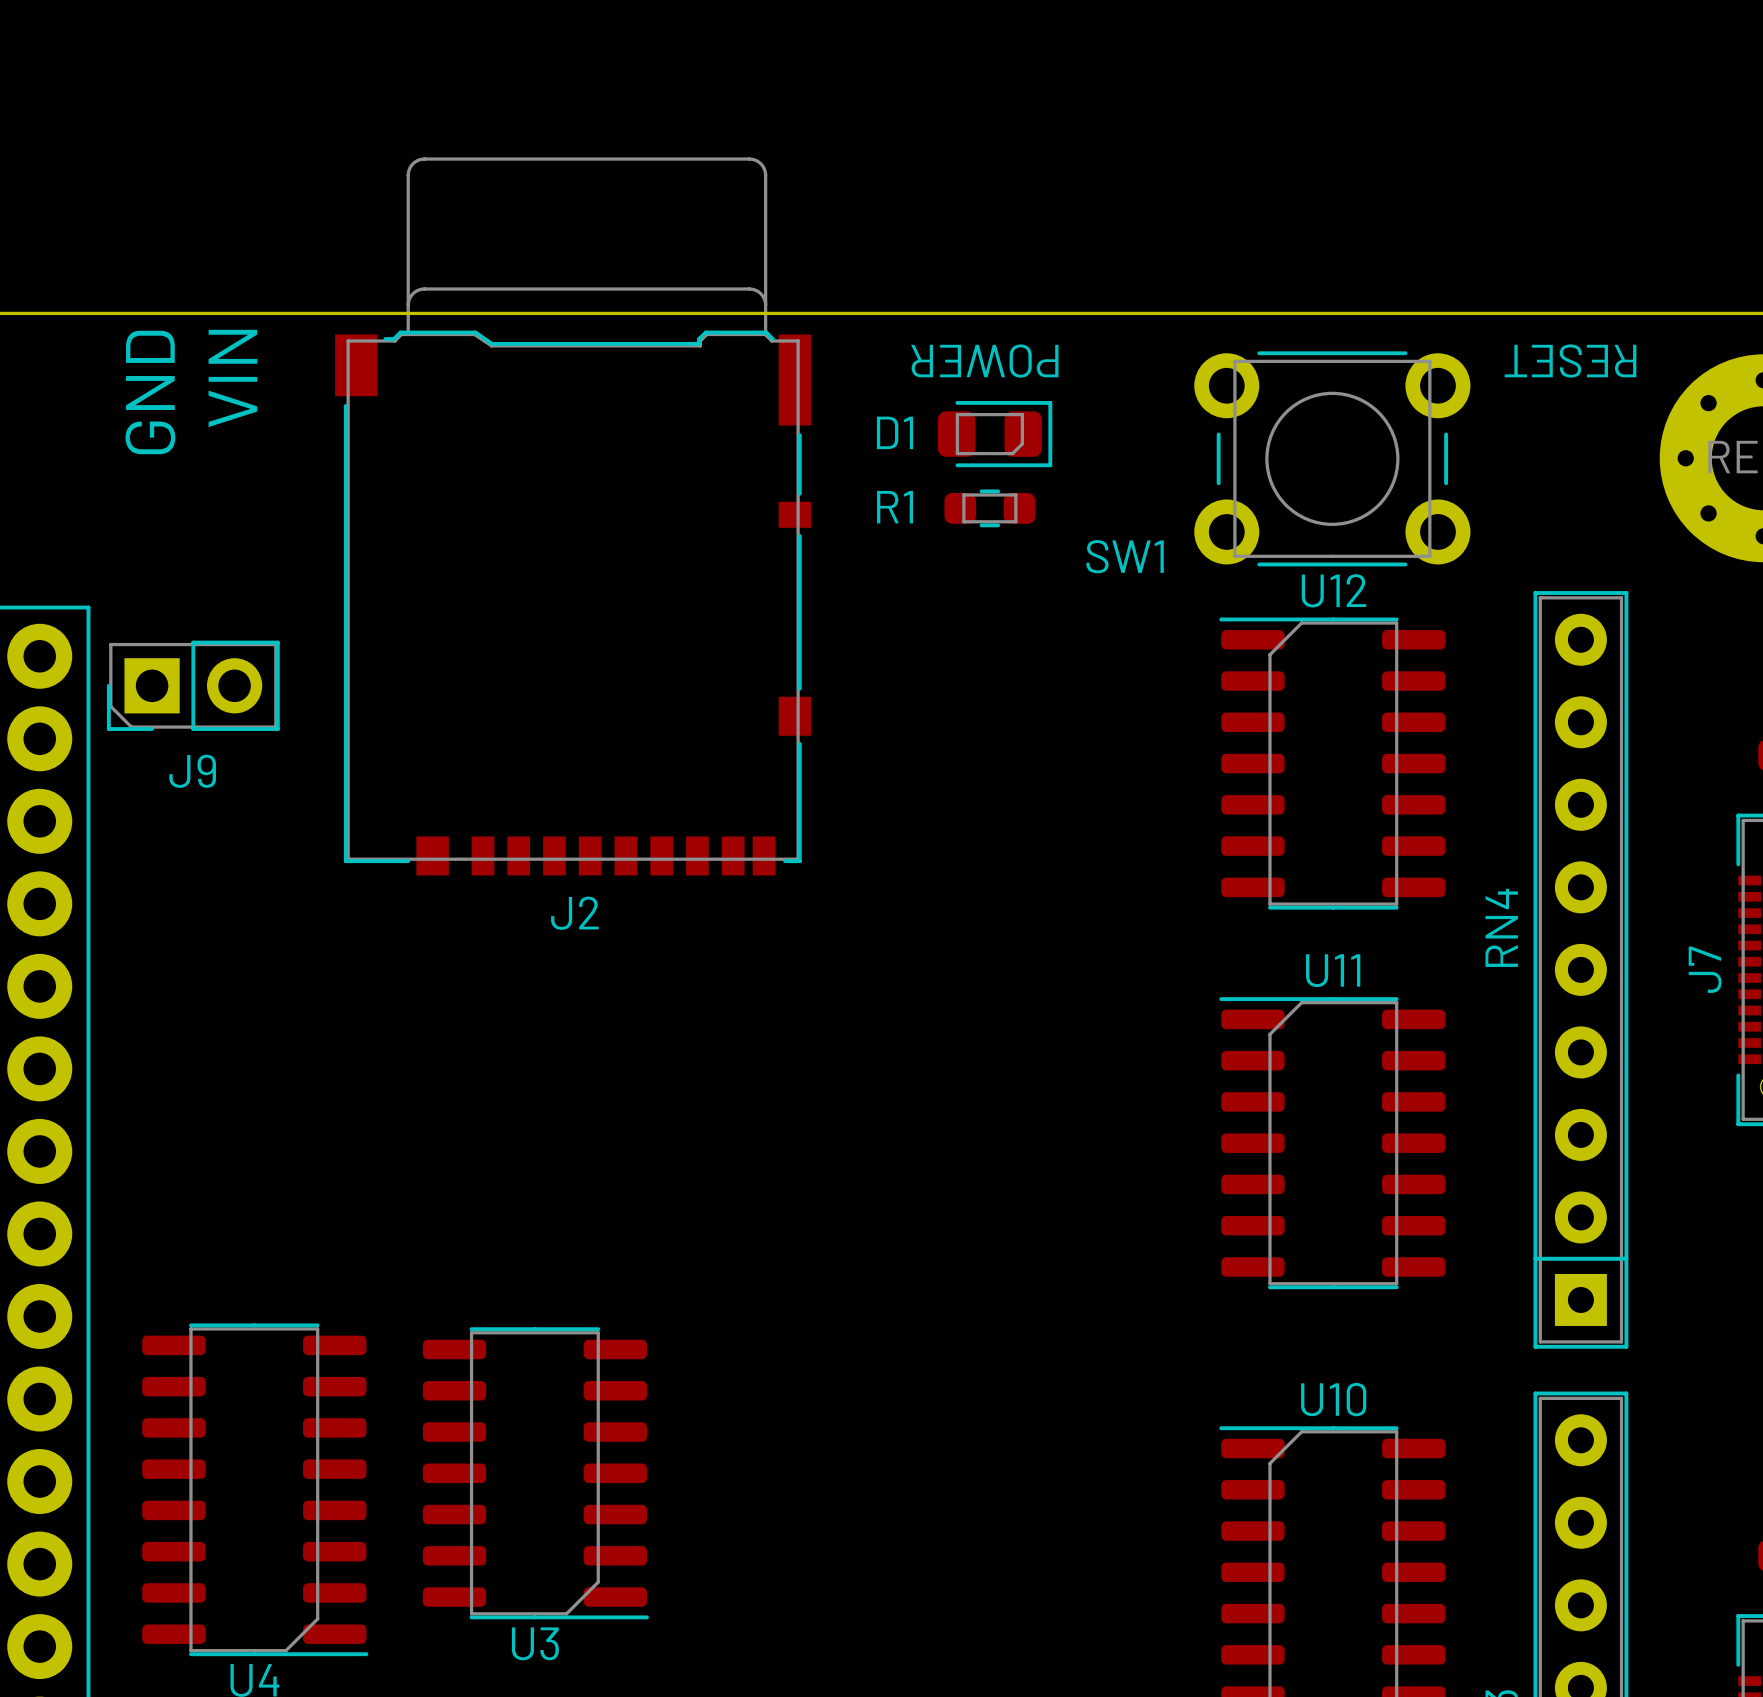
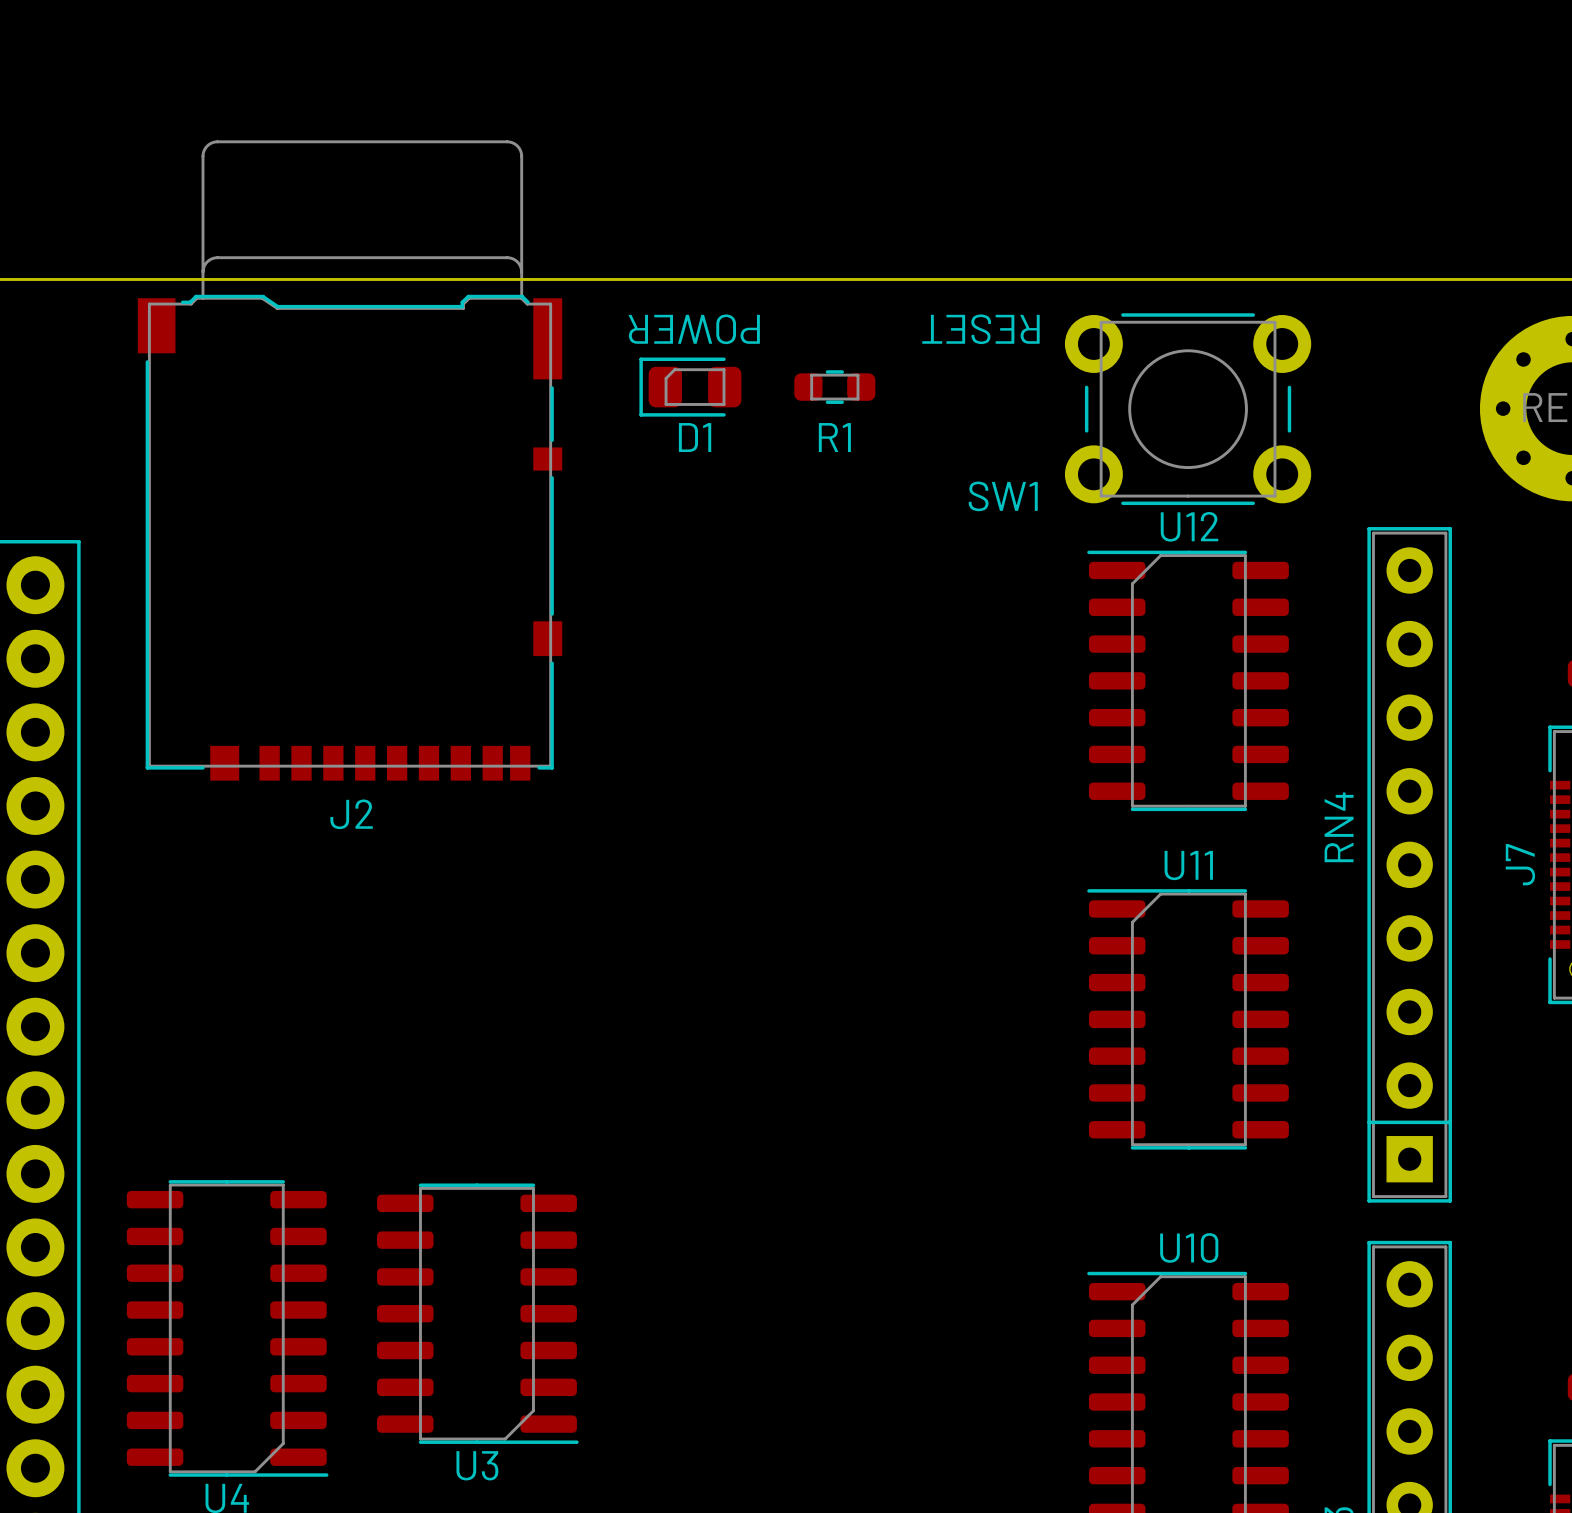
text position: POWER (984, 361) -> POWER (694, 329)
text position: RESET (1570, 361) -> RESET (980, 329)
text: VIN (232, 378) -> none
text: GND (150, 392) -> none
D1 name position: D1 (895, 432) -> D1 (695, 437)
D1 rotation: 0° (995, 434) -> 180° (690, 387)
D1 position: (995, 434) -> (690, 387)
R1 name position: R1 (895, 507) -> R1 (834, 437)
R1 position: (989, 508) -> (834, 387)
J2 position: (573, 516) -> (350, 460)
J9: (193, 685) -> none

